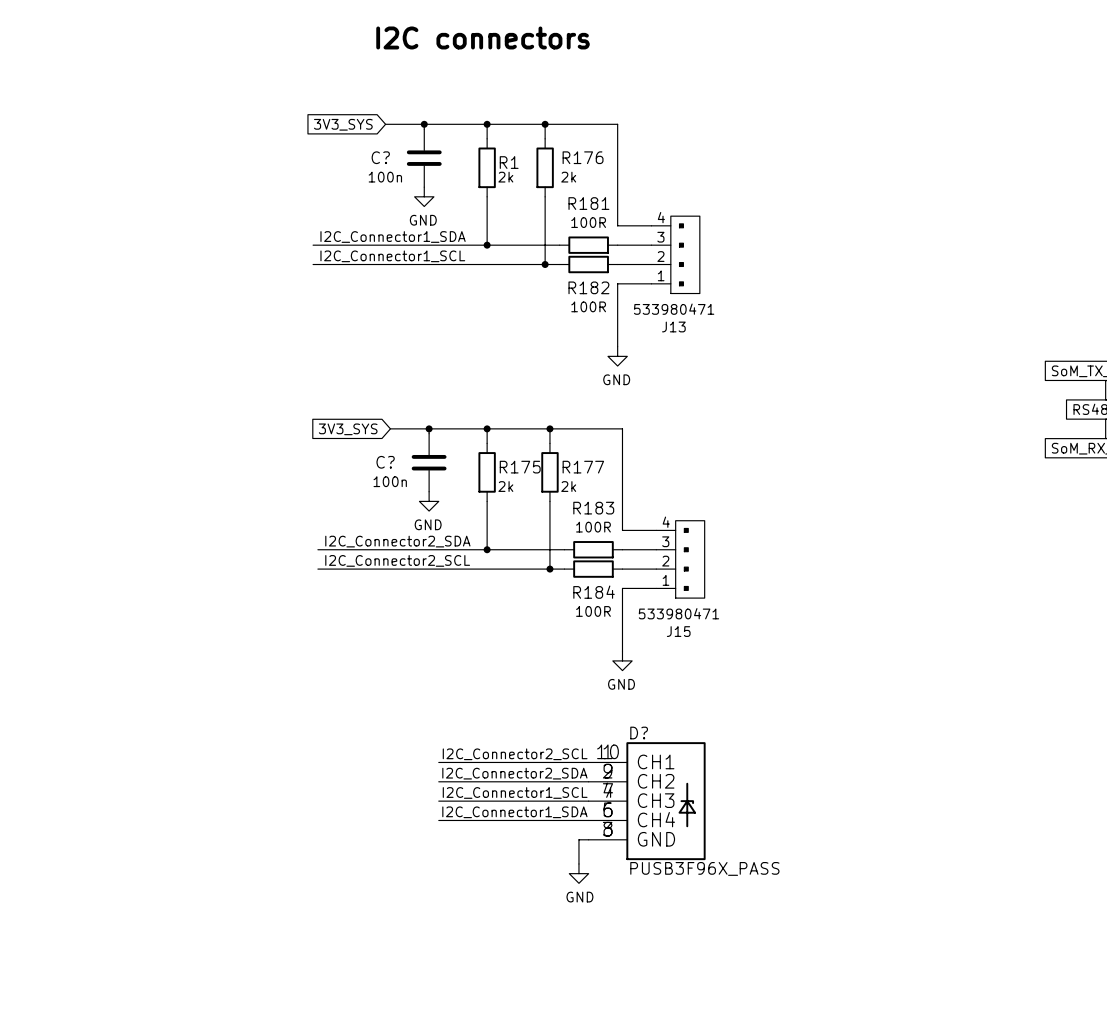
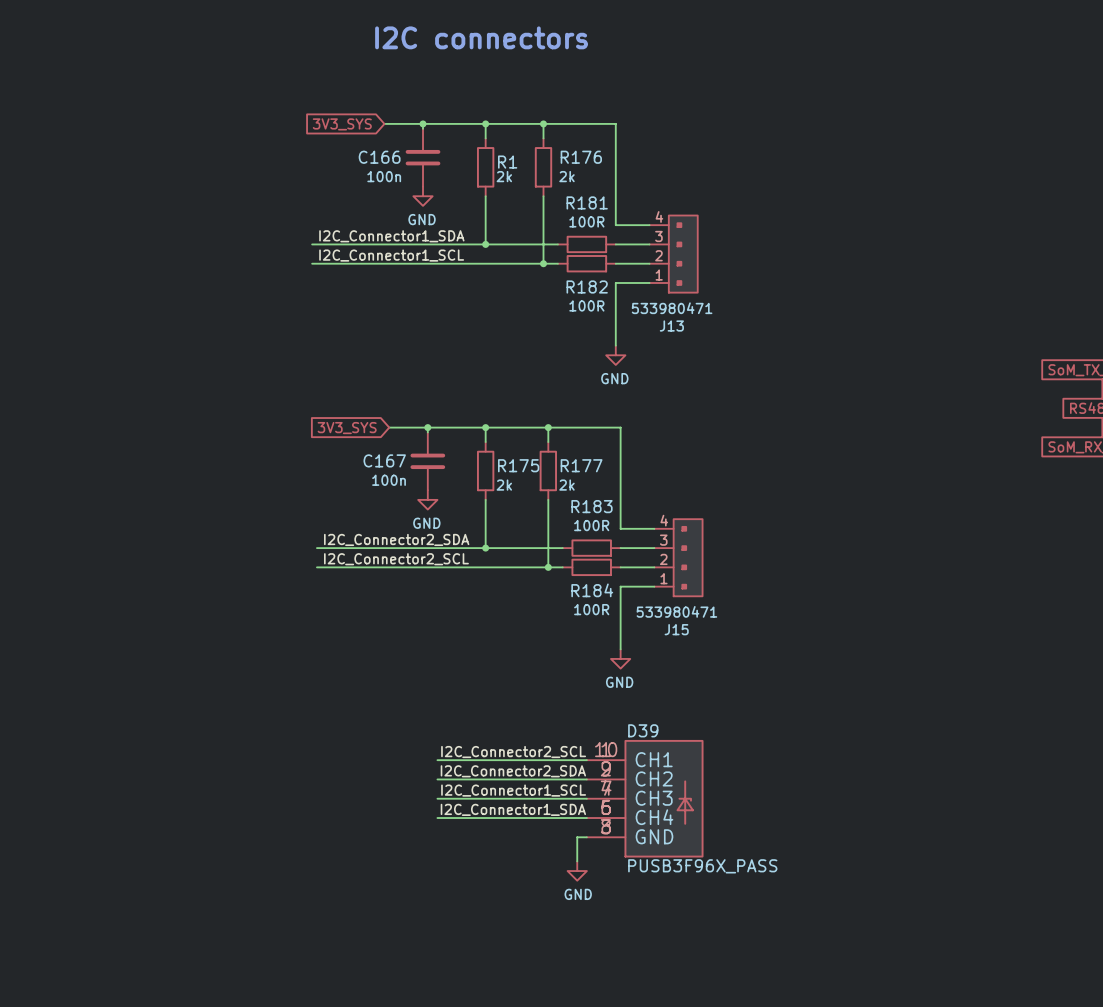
C? name: C? (380, 157) -> C166 (379, 157)
C? name: C? (385, 462) -> C167 (384, 460)
D? name: D? (639, 733) -> D39 (643, 730)

